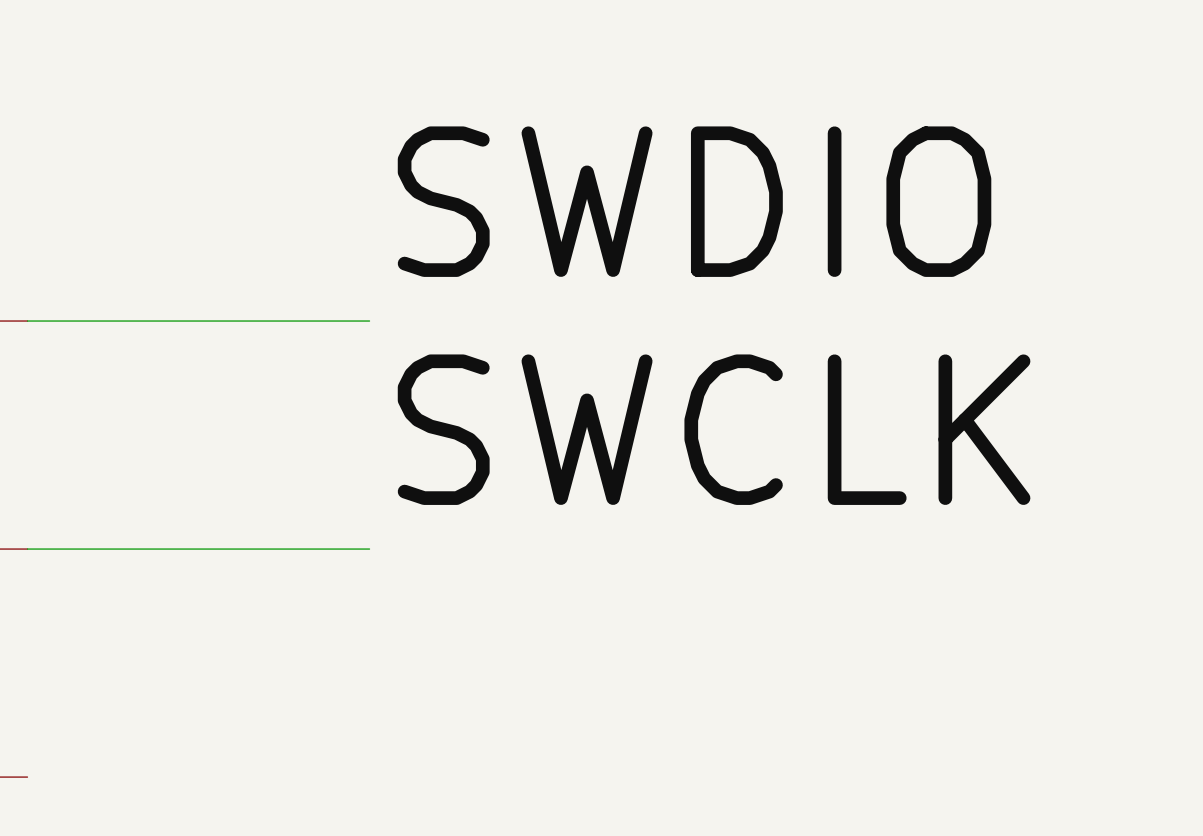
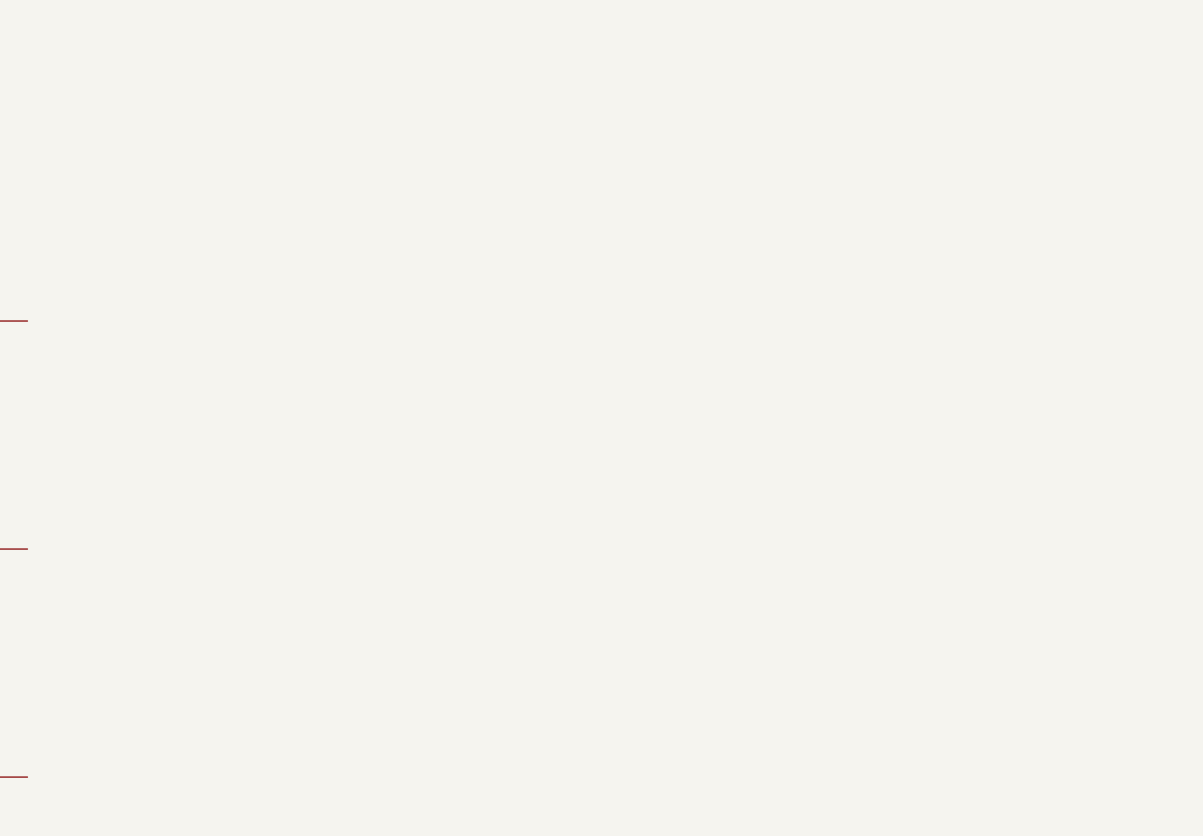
label: SWDIO (694, 201) -> none
wire: (27, 321) (369, 321) -> none
label: SWCLK (714, 429) -> none
wire: (27, 549) (369, 549) -> none

